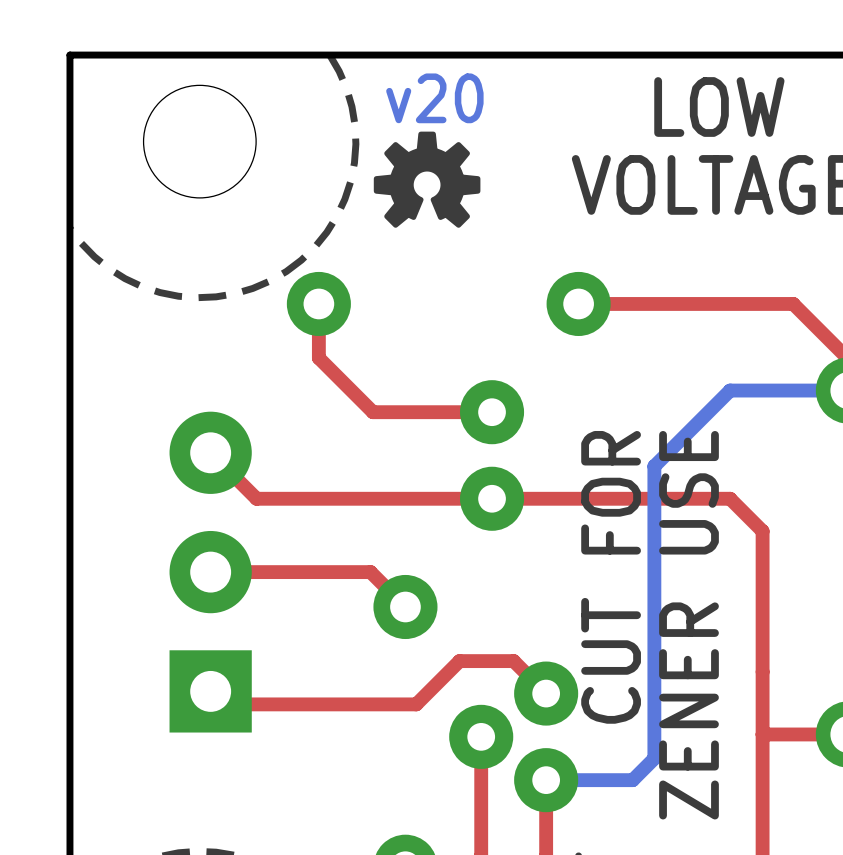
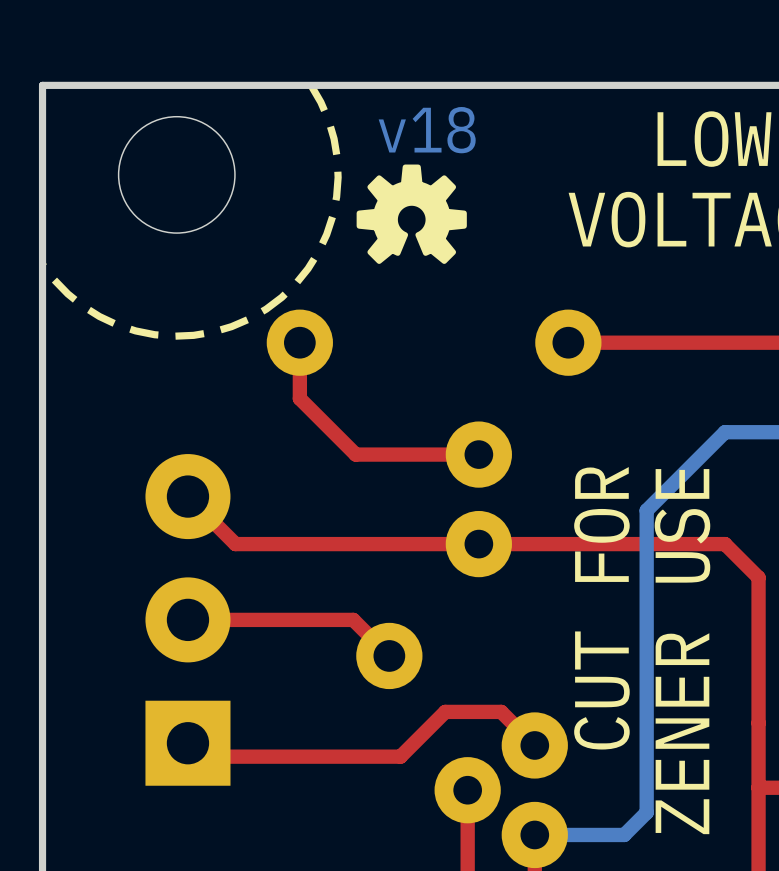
text: v20 (434, 98) -> v18 (427, 130)

